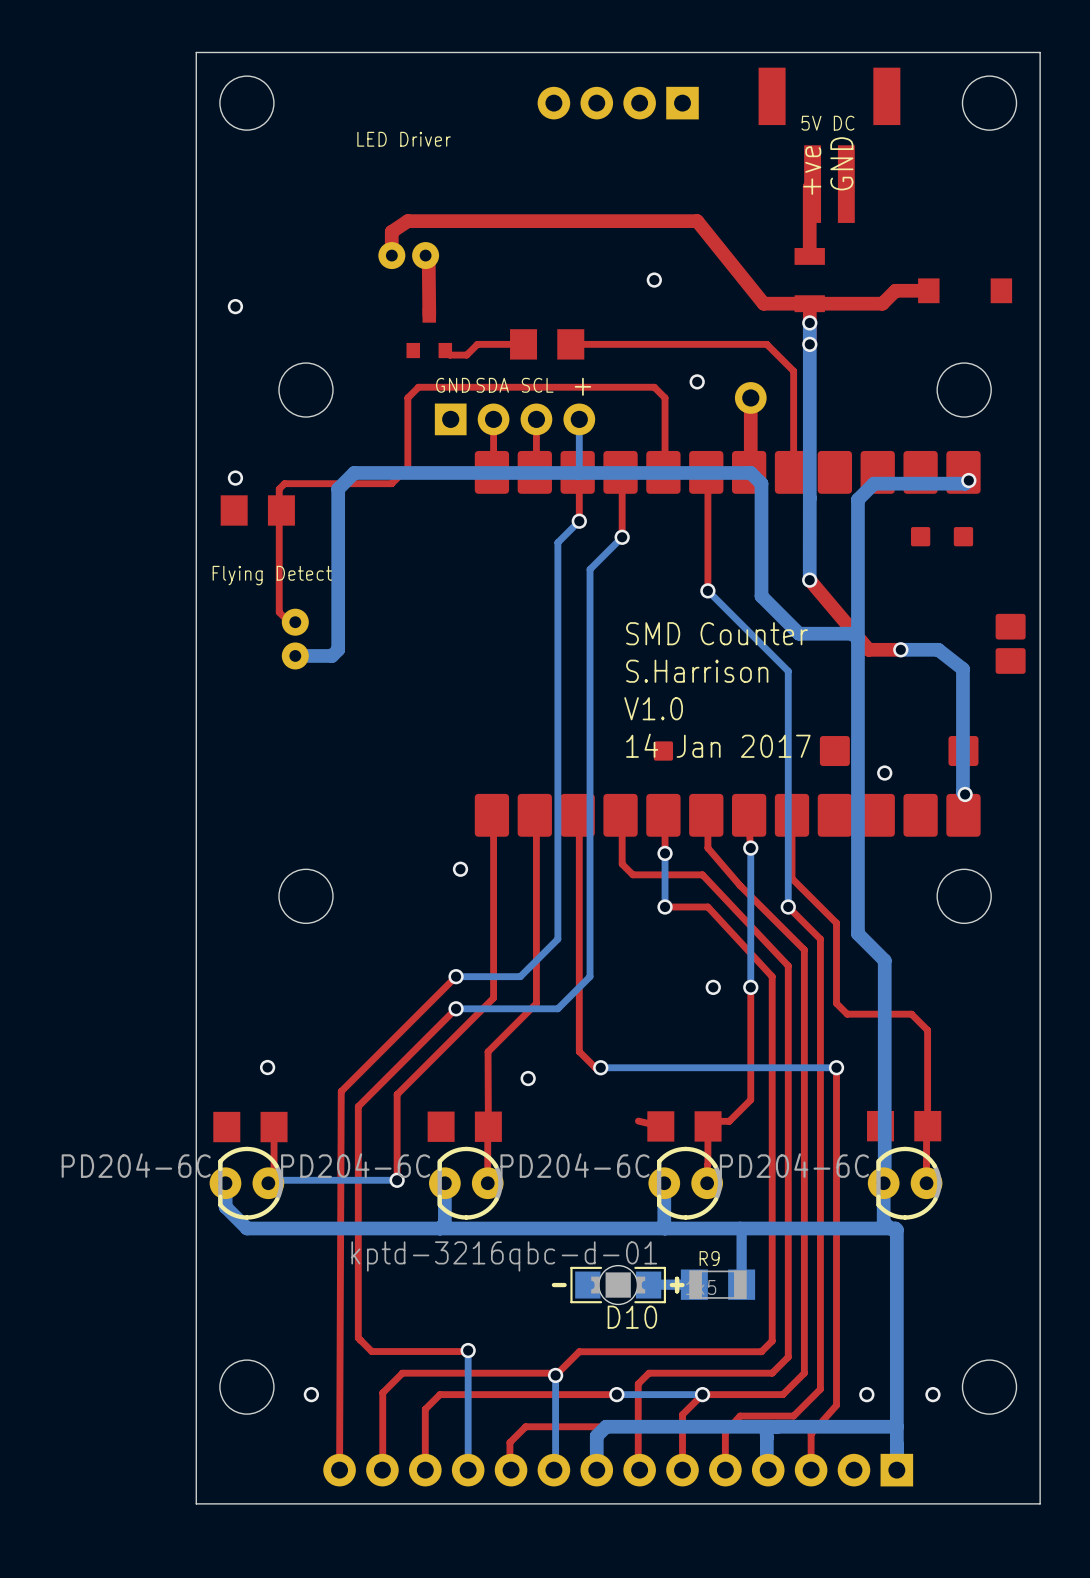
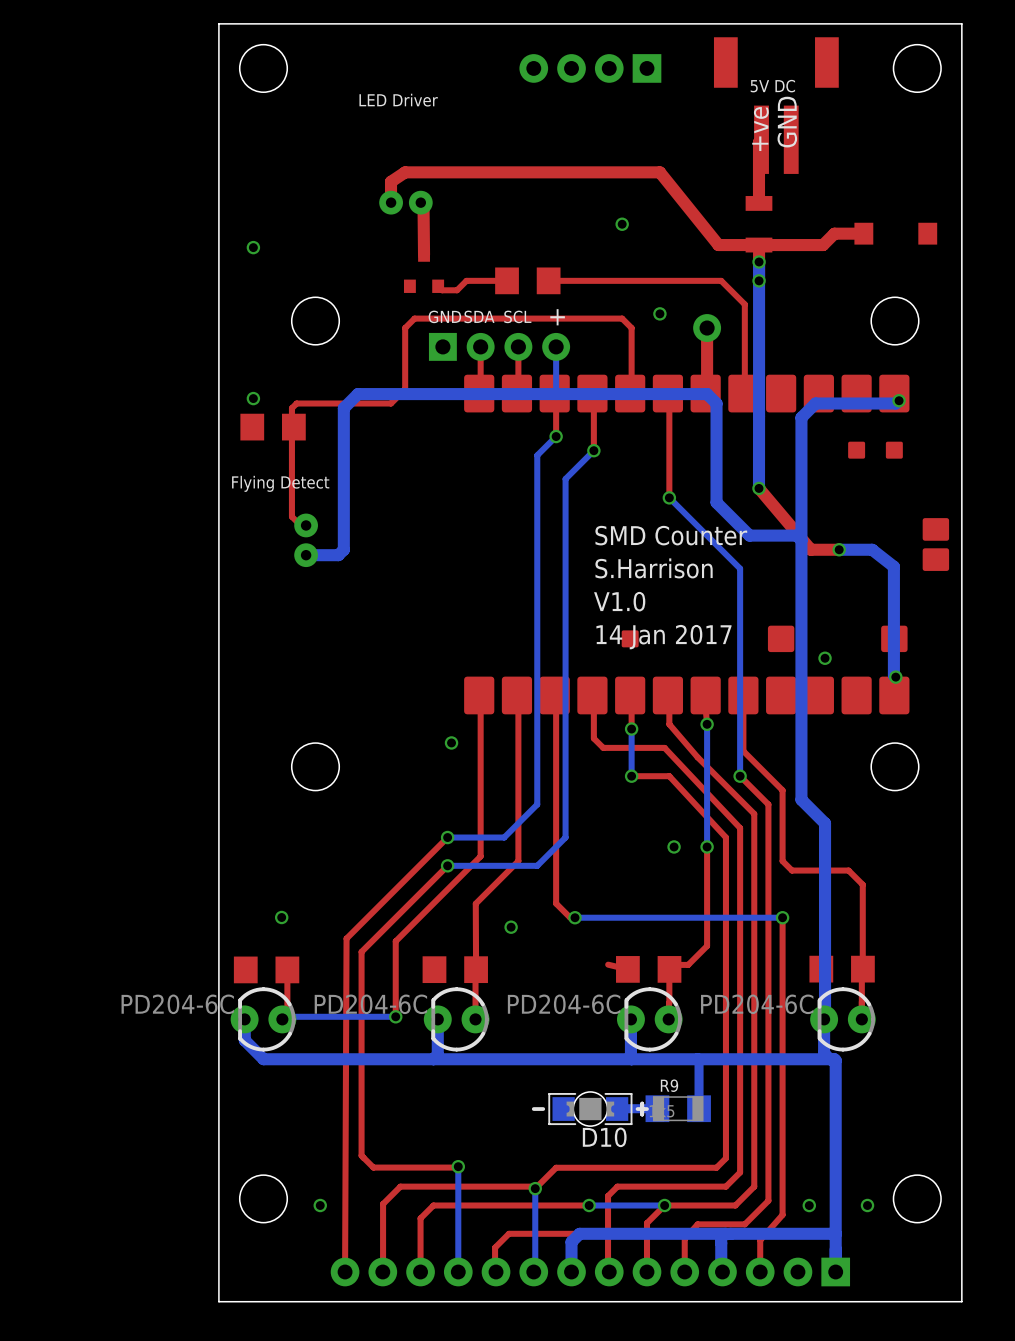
D10 value: kptd-3216qbc-d-01 (504, 1256) -> none

